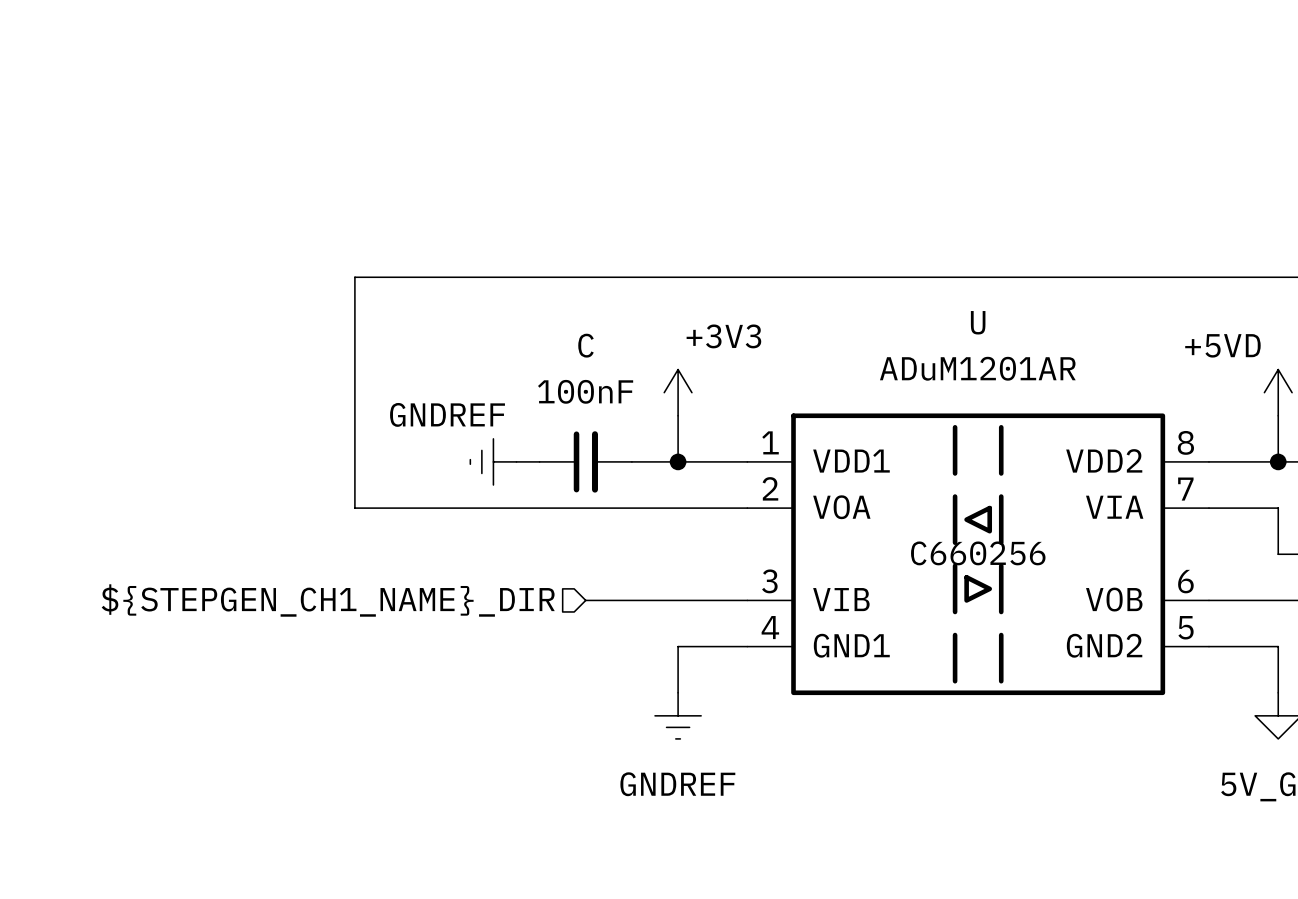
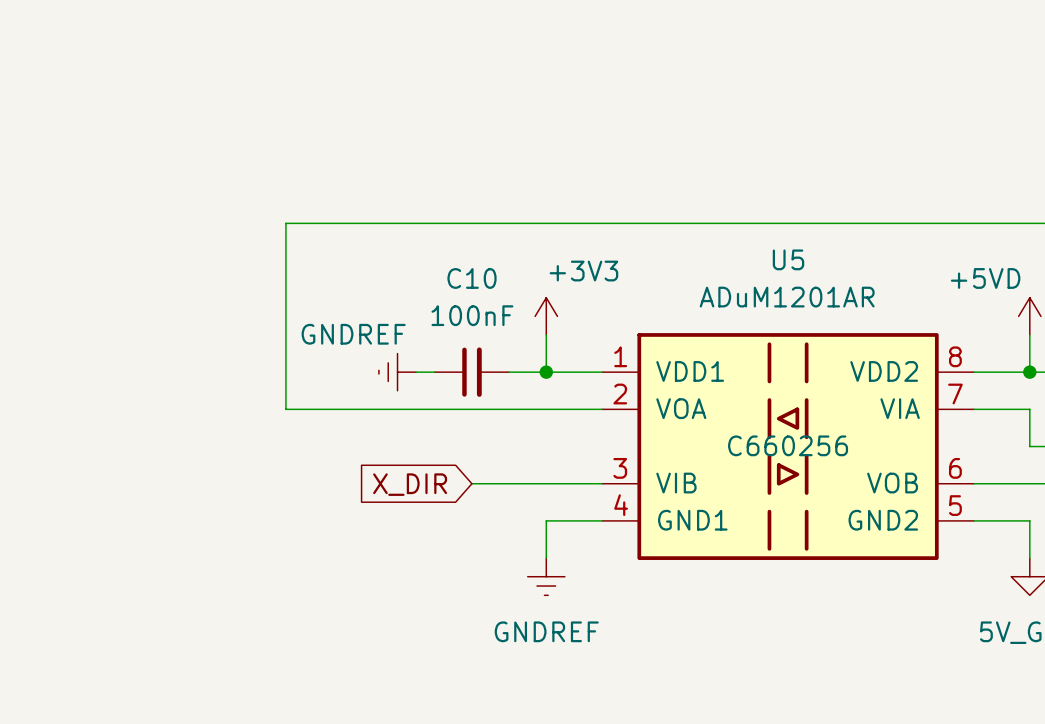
U name: U (978, 322) -> U5 (788, 259)
C name: C (586, 345) -> C10 (472, 278)
hierarchical label: ${STEPGEN_CH1_NAME}_DIR (328, 600) -> none
global label: none -> X_DIR (410, 484)

